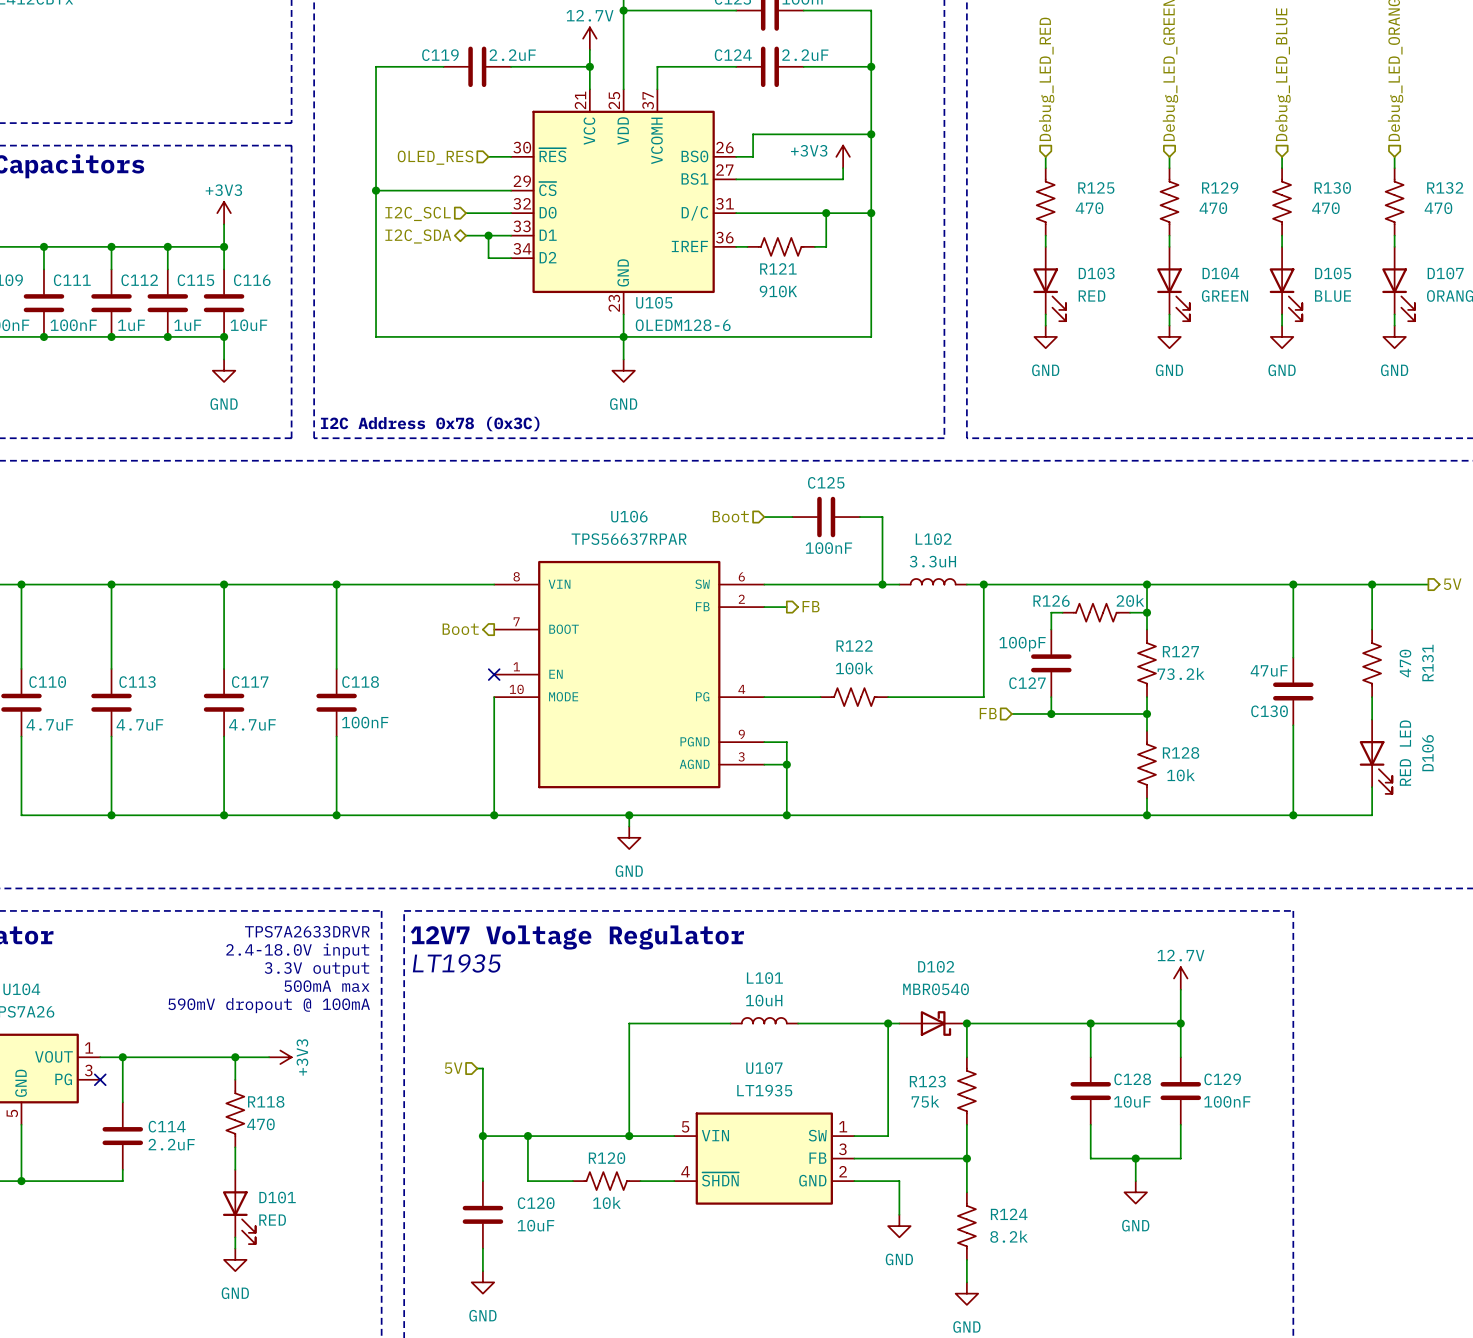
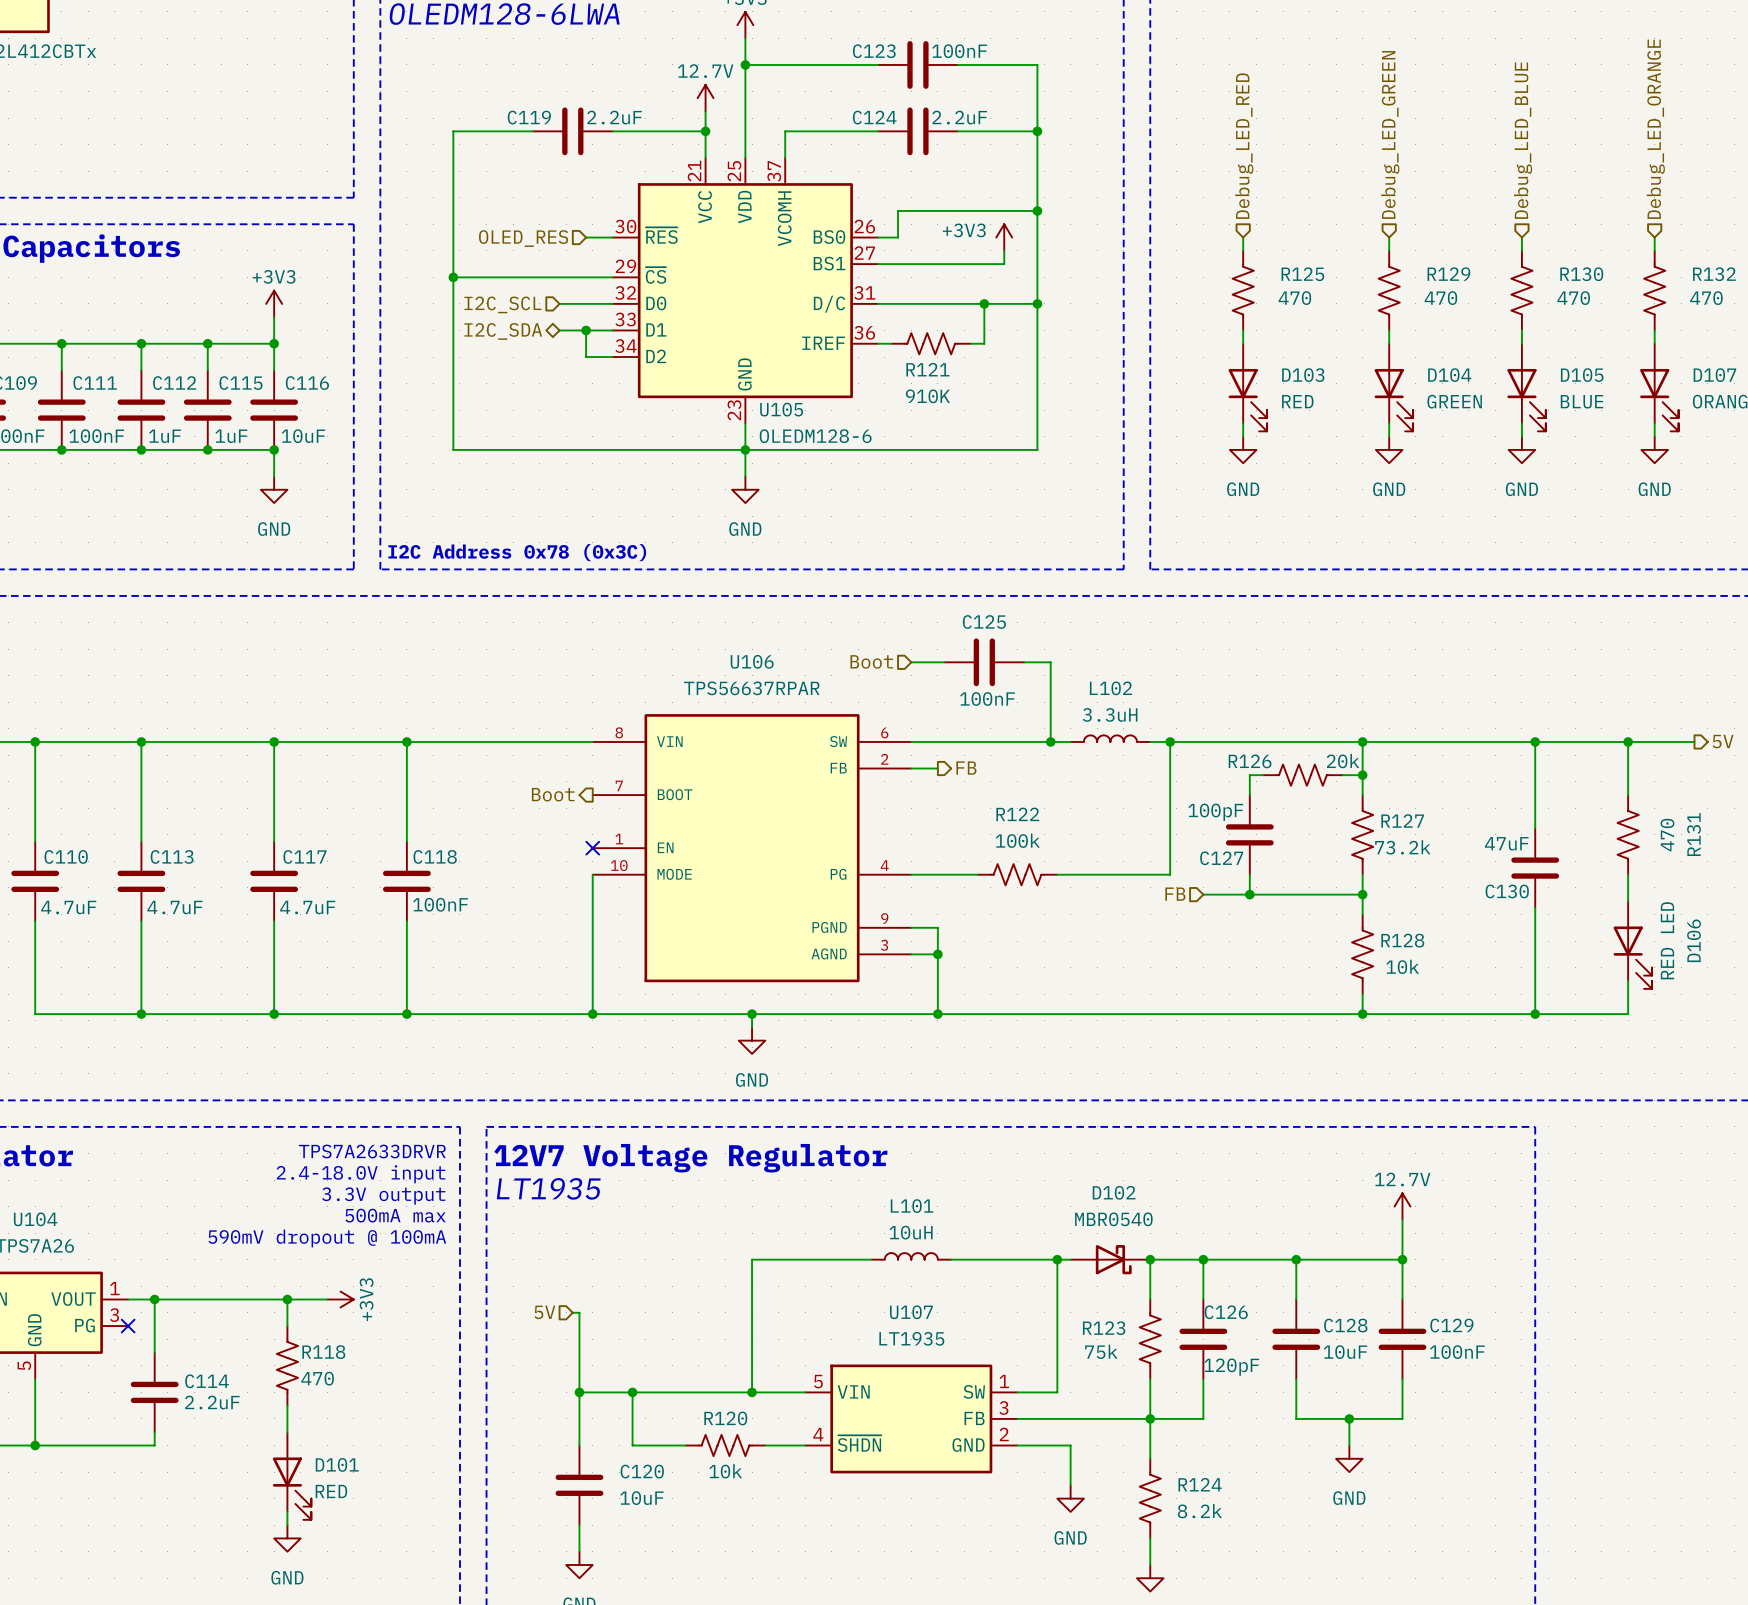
wire: none -> (1203, 1259) (1203, 1299)
junction: none -> (1203, 1259)
C126: none -> 120pF (1203, 1339)
wire: none -> (1203, 1379) (1203, 1418) (1150, 1418)

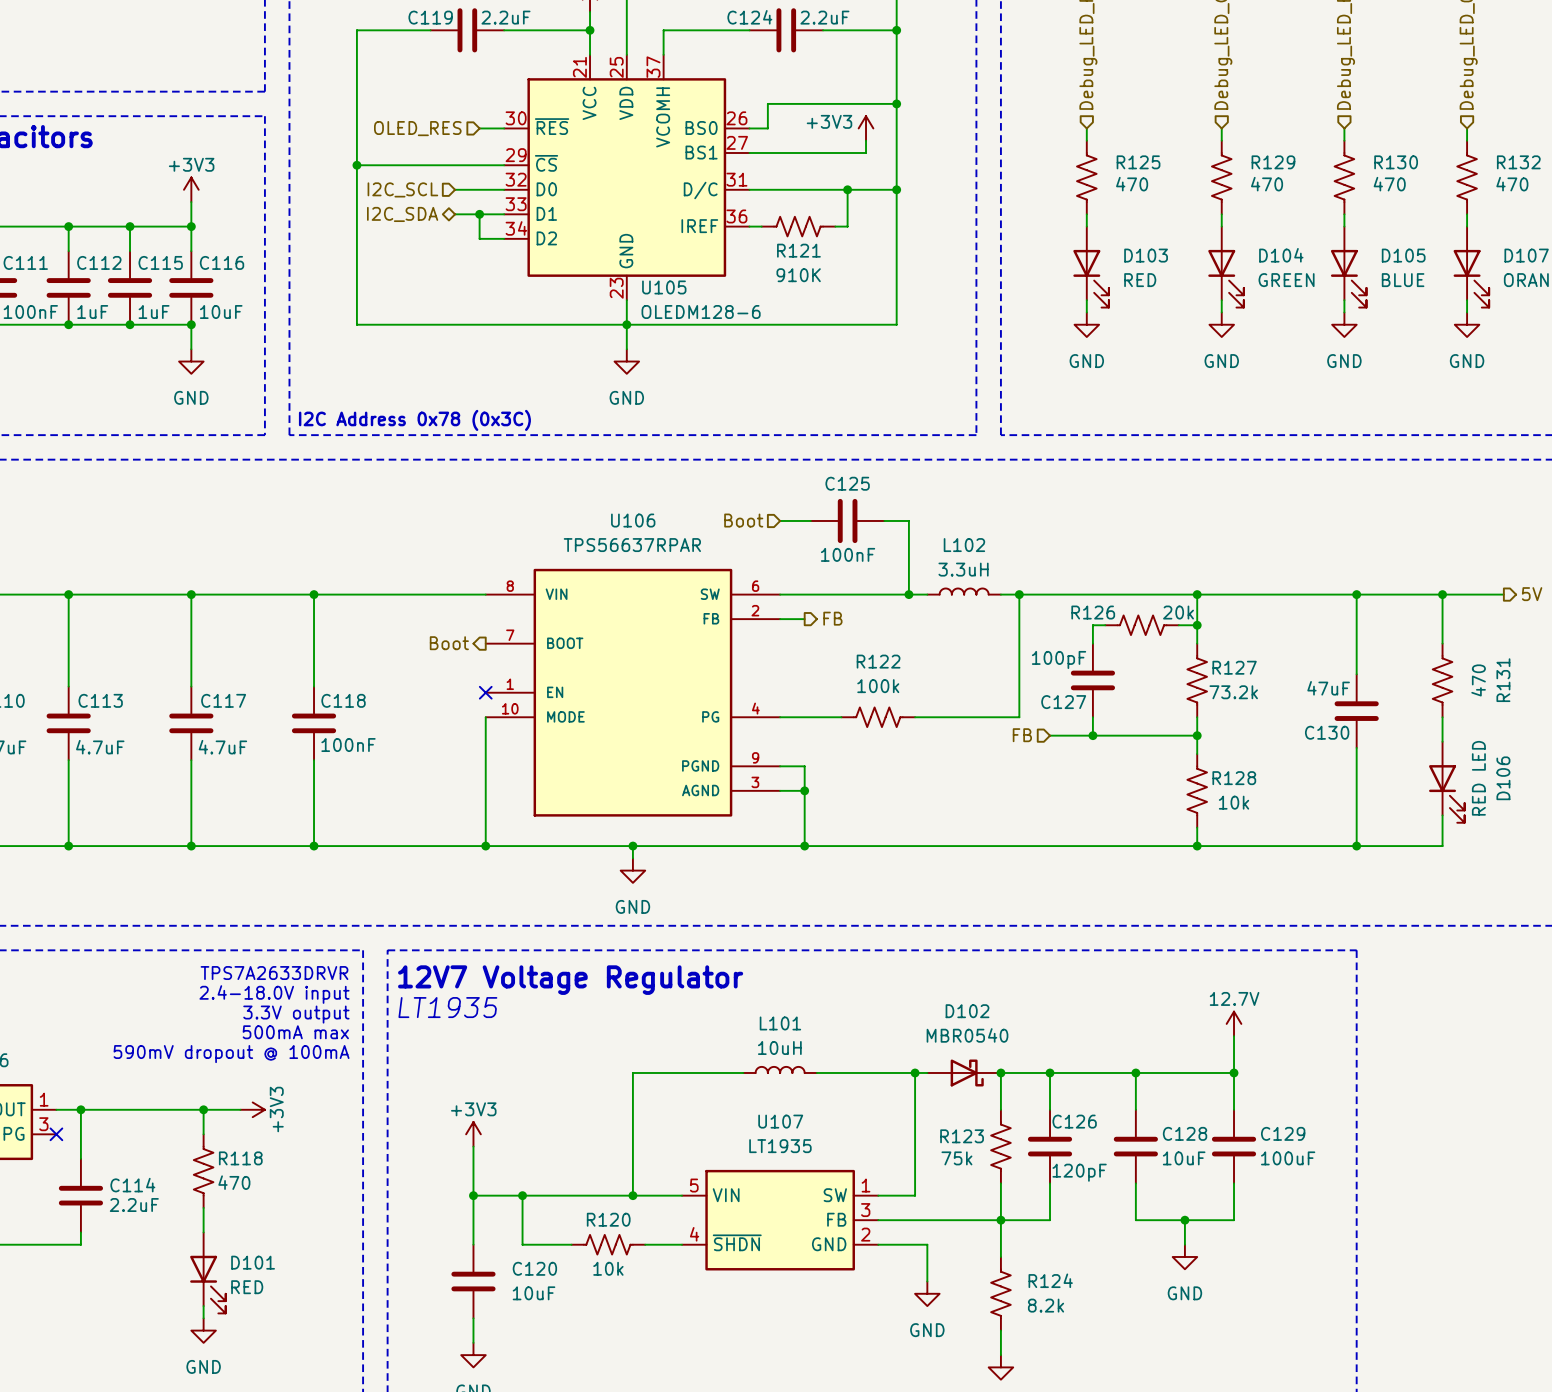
hierarchical label: 5V (544, 1312) -> none
power symbol: none -> +3V3 (473, 1134)
C129 value: 100nF (1457, 1352) -> 100uF (1288, 1158)

